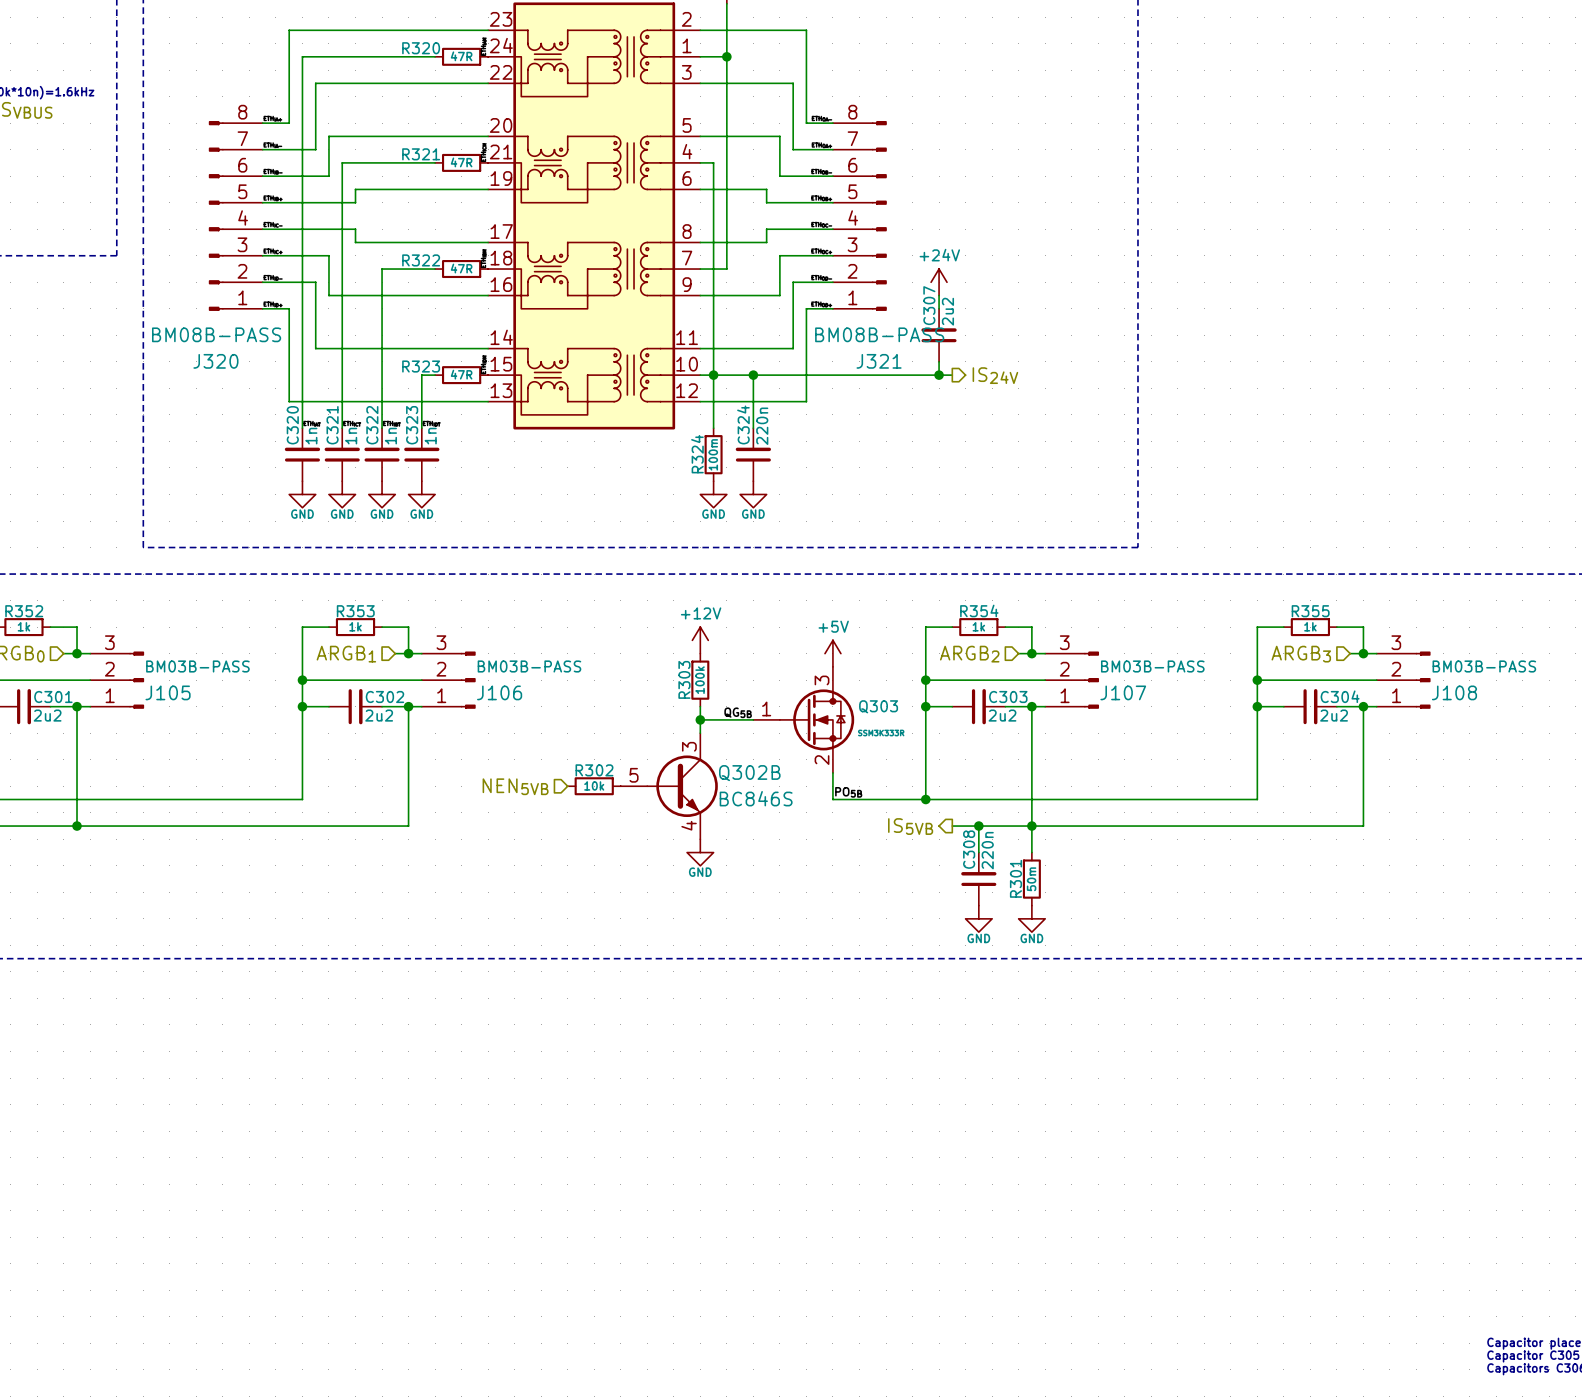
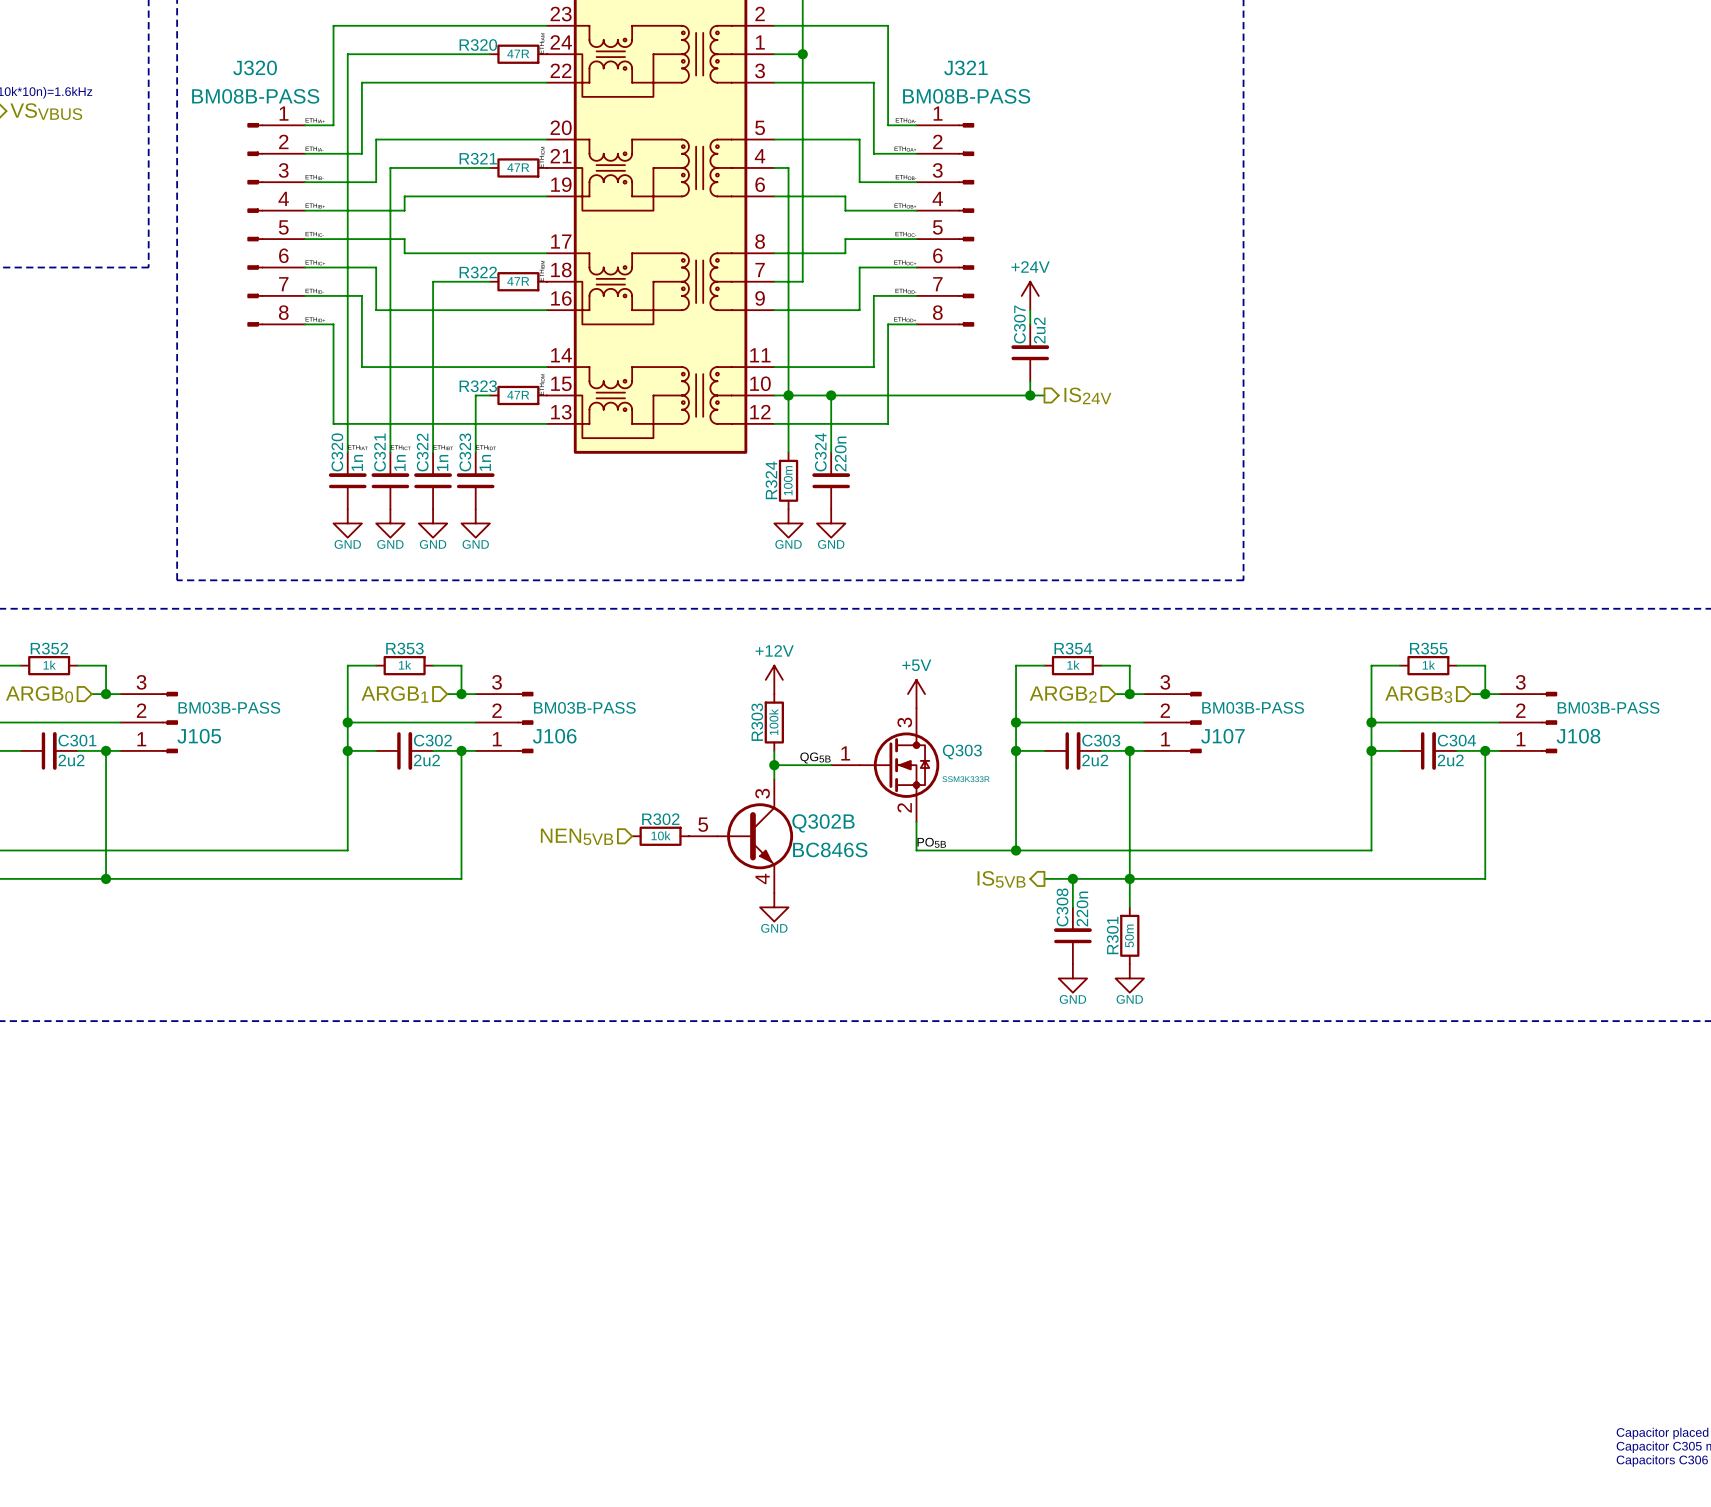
J320 flip: as is (216, 215) -> up-down (255, 224)
J321 flip: as is (879, 215) -> up-down (966, 224)

